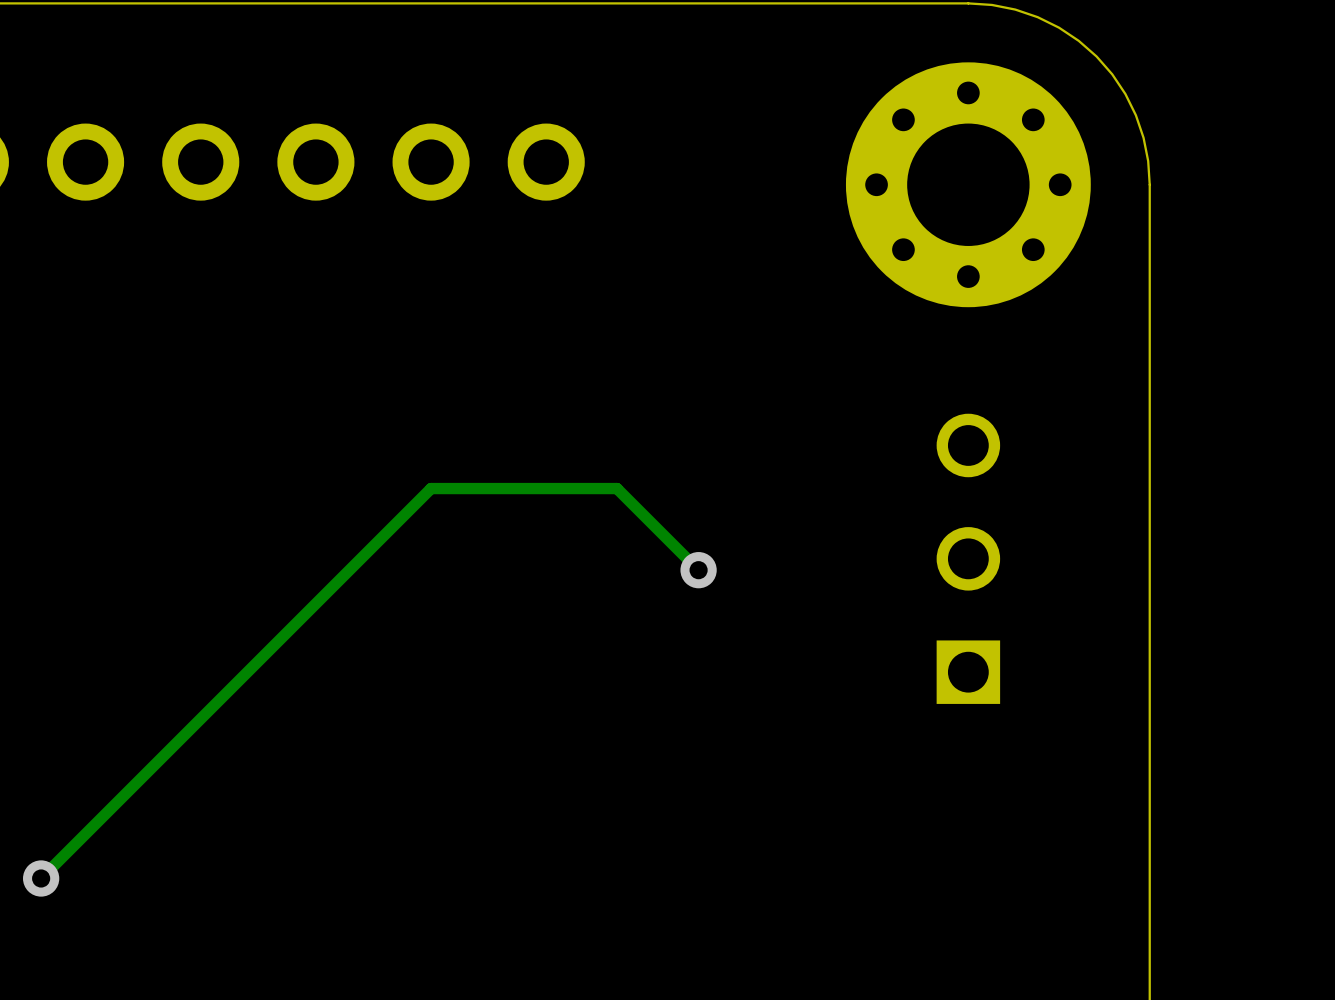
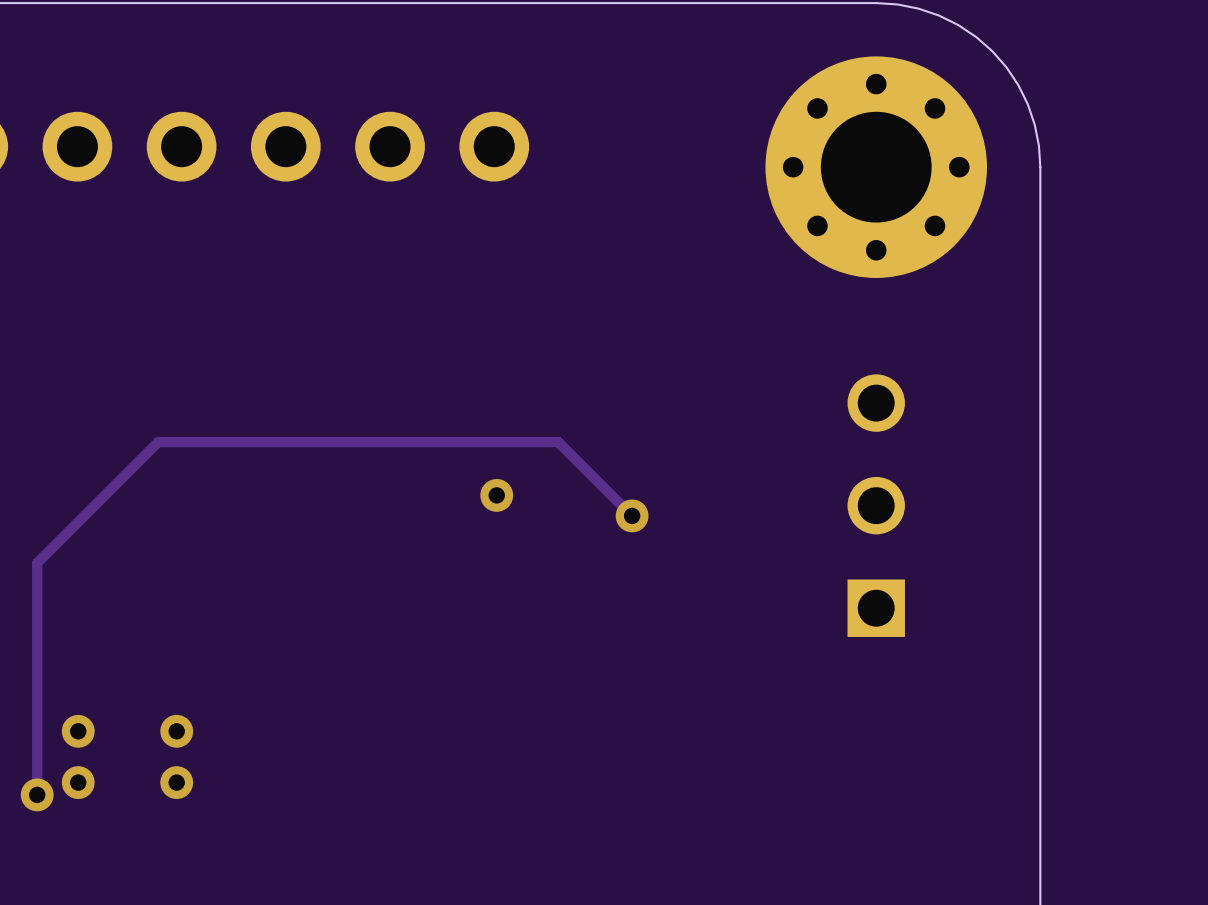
track: (431, 488) (41, 878) -> (390, 442) (158, 442) (37, 563) (37, 794)
via: none -> (496, 495)
via: none -> (78, 731)
via: none -> (176, 731)
via: none -> (78, 782)
via: none -> (176, 782)

